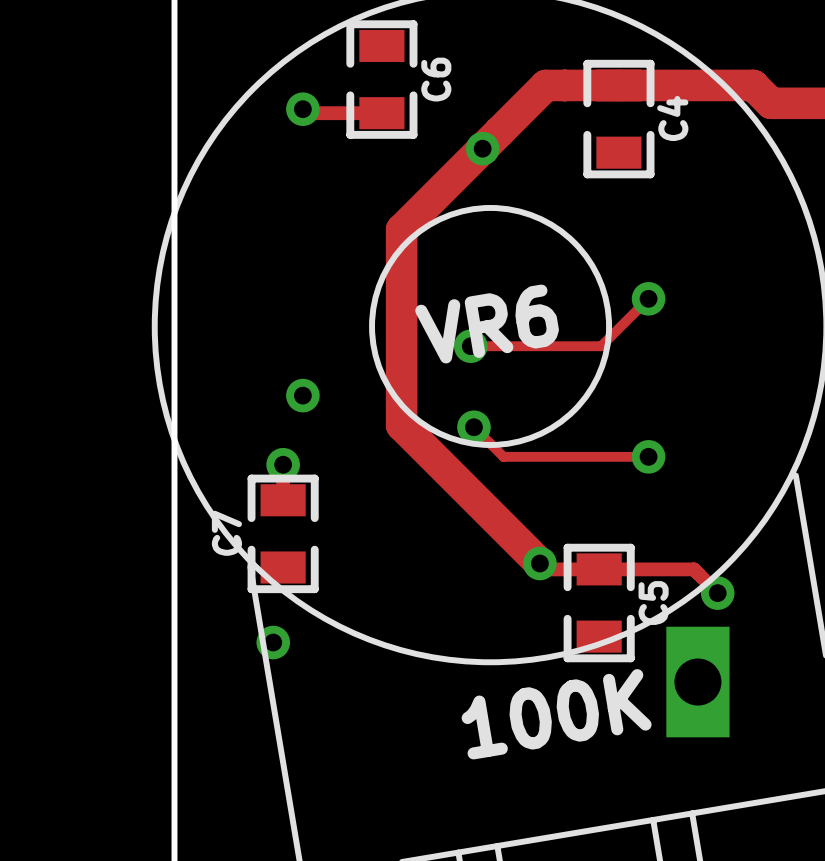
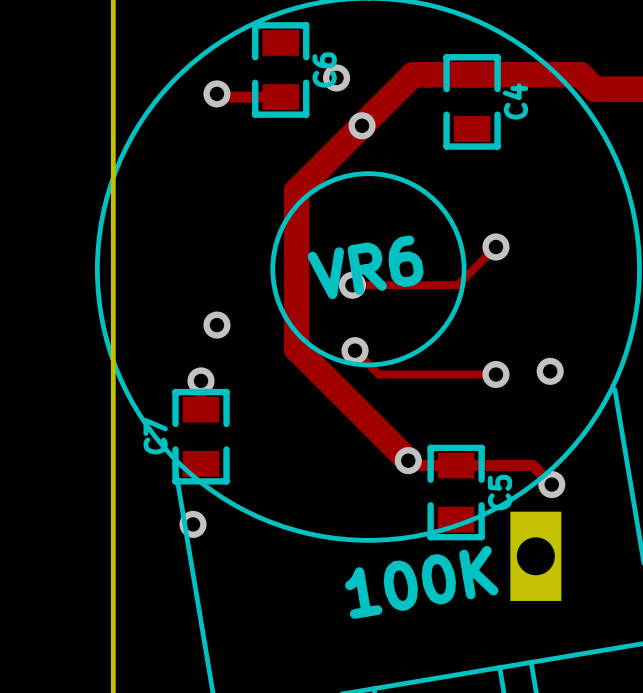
via: none -> (336, 77)
via: none -> (550, 371)

